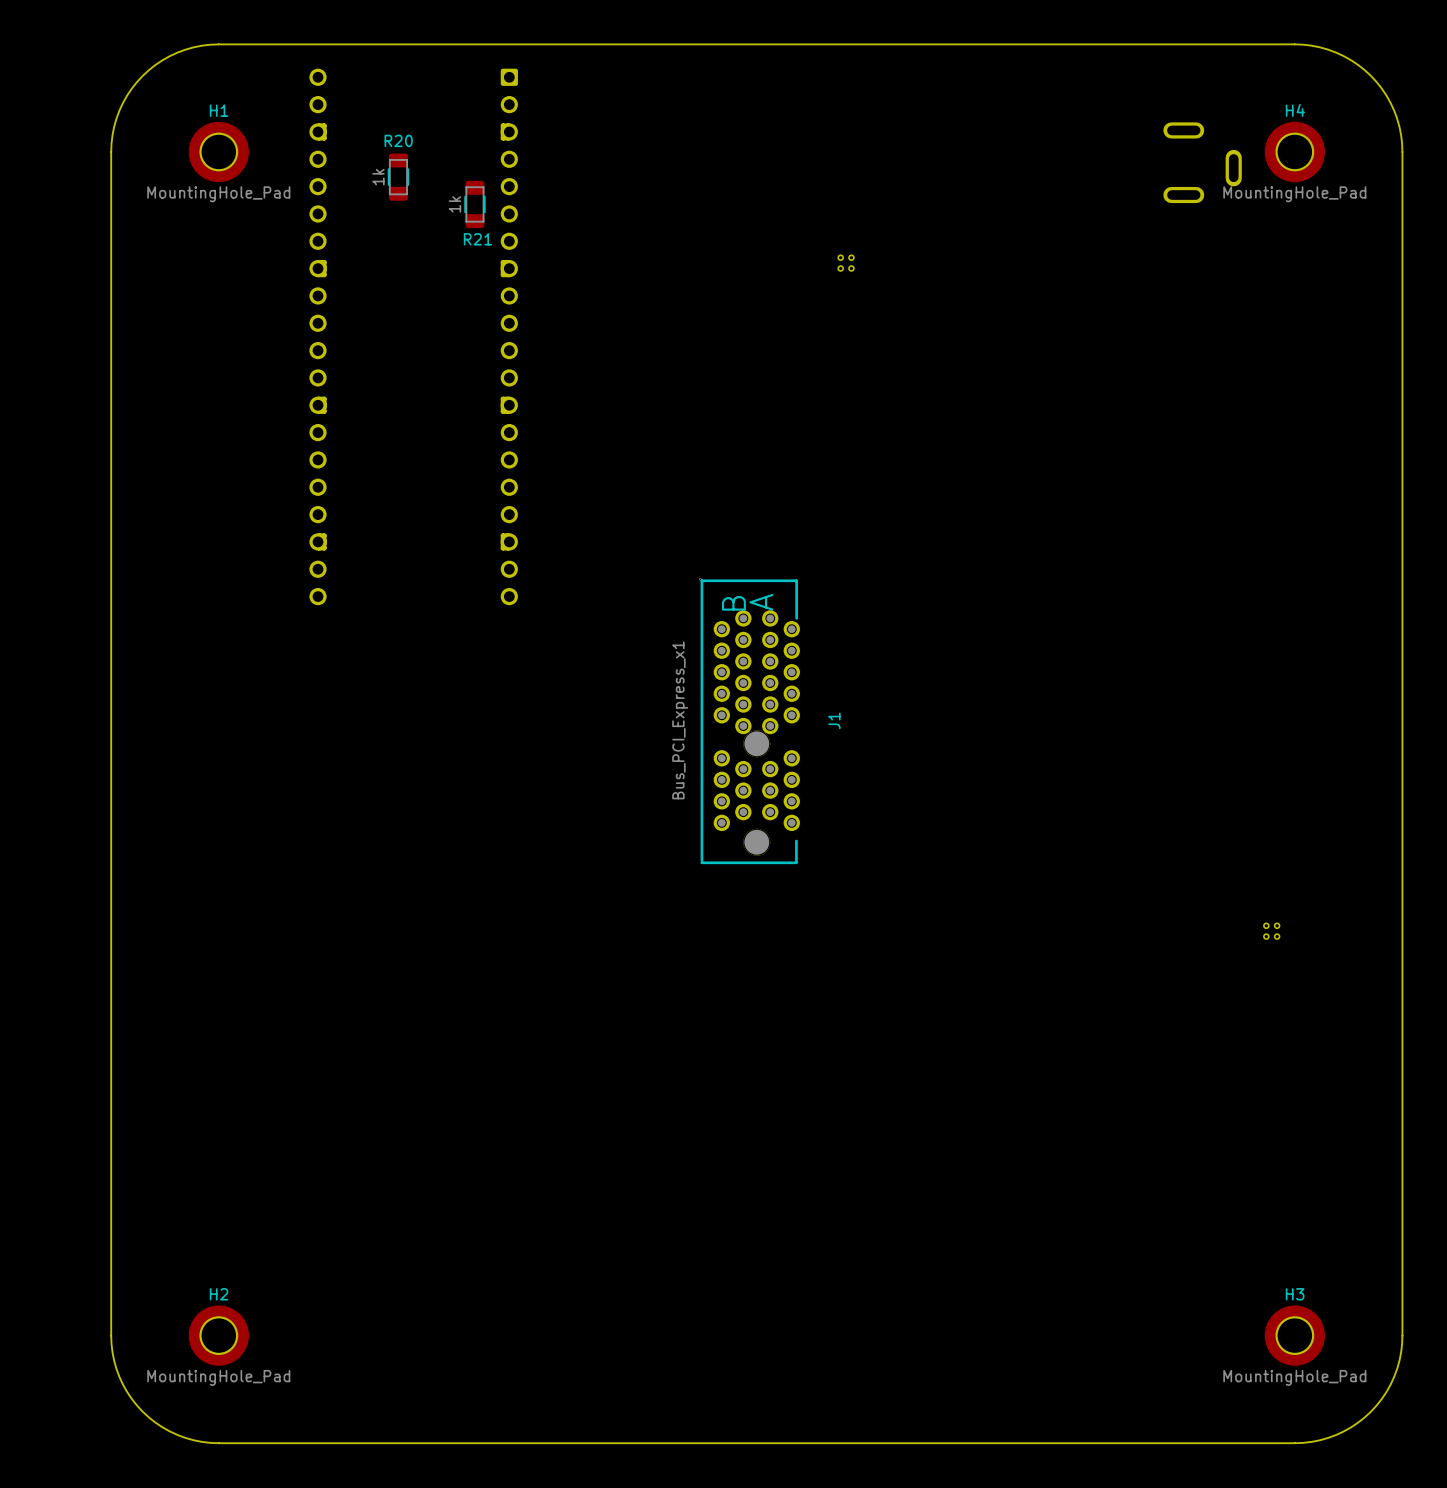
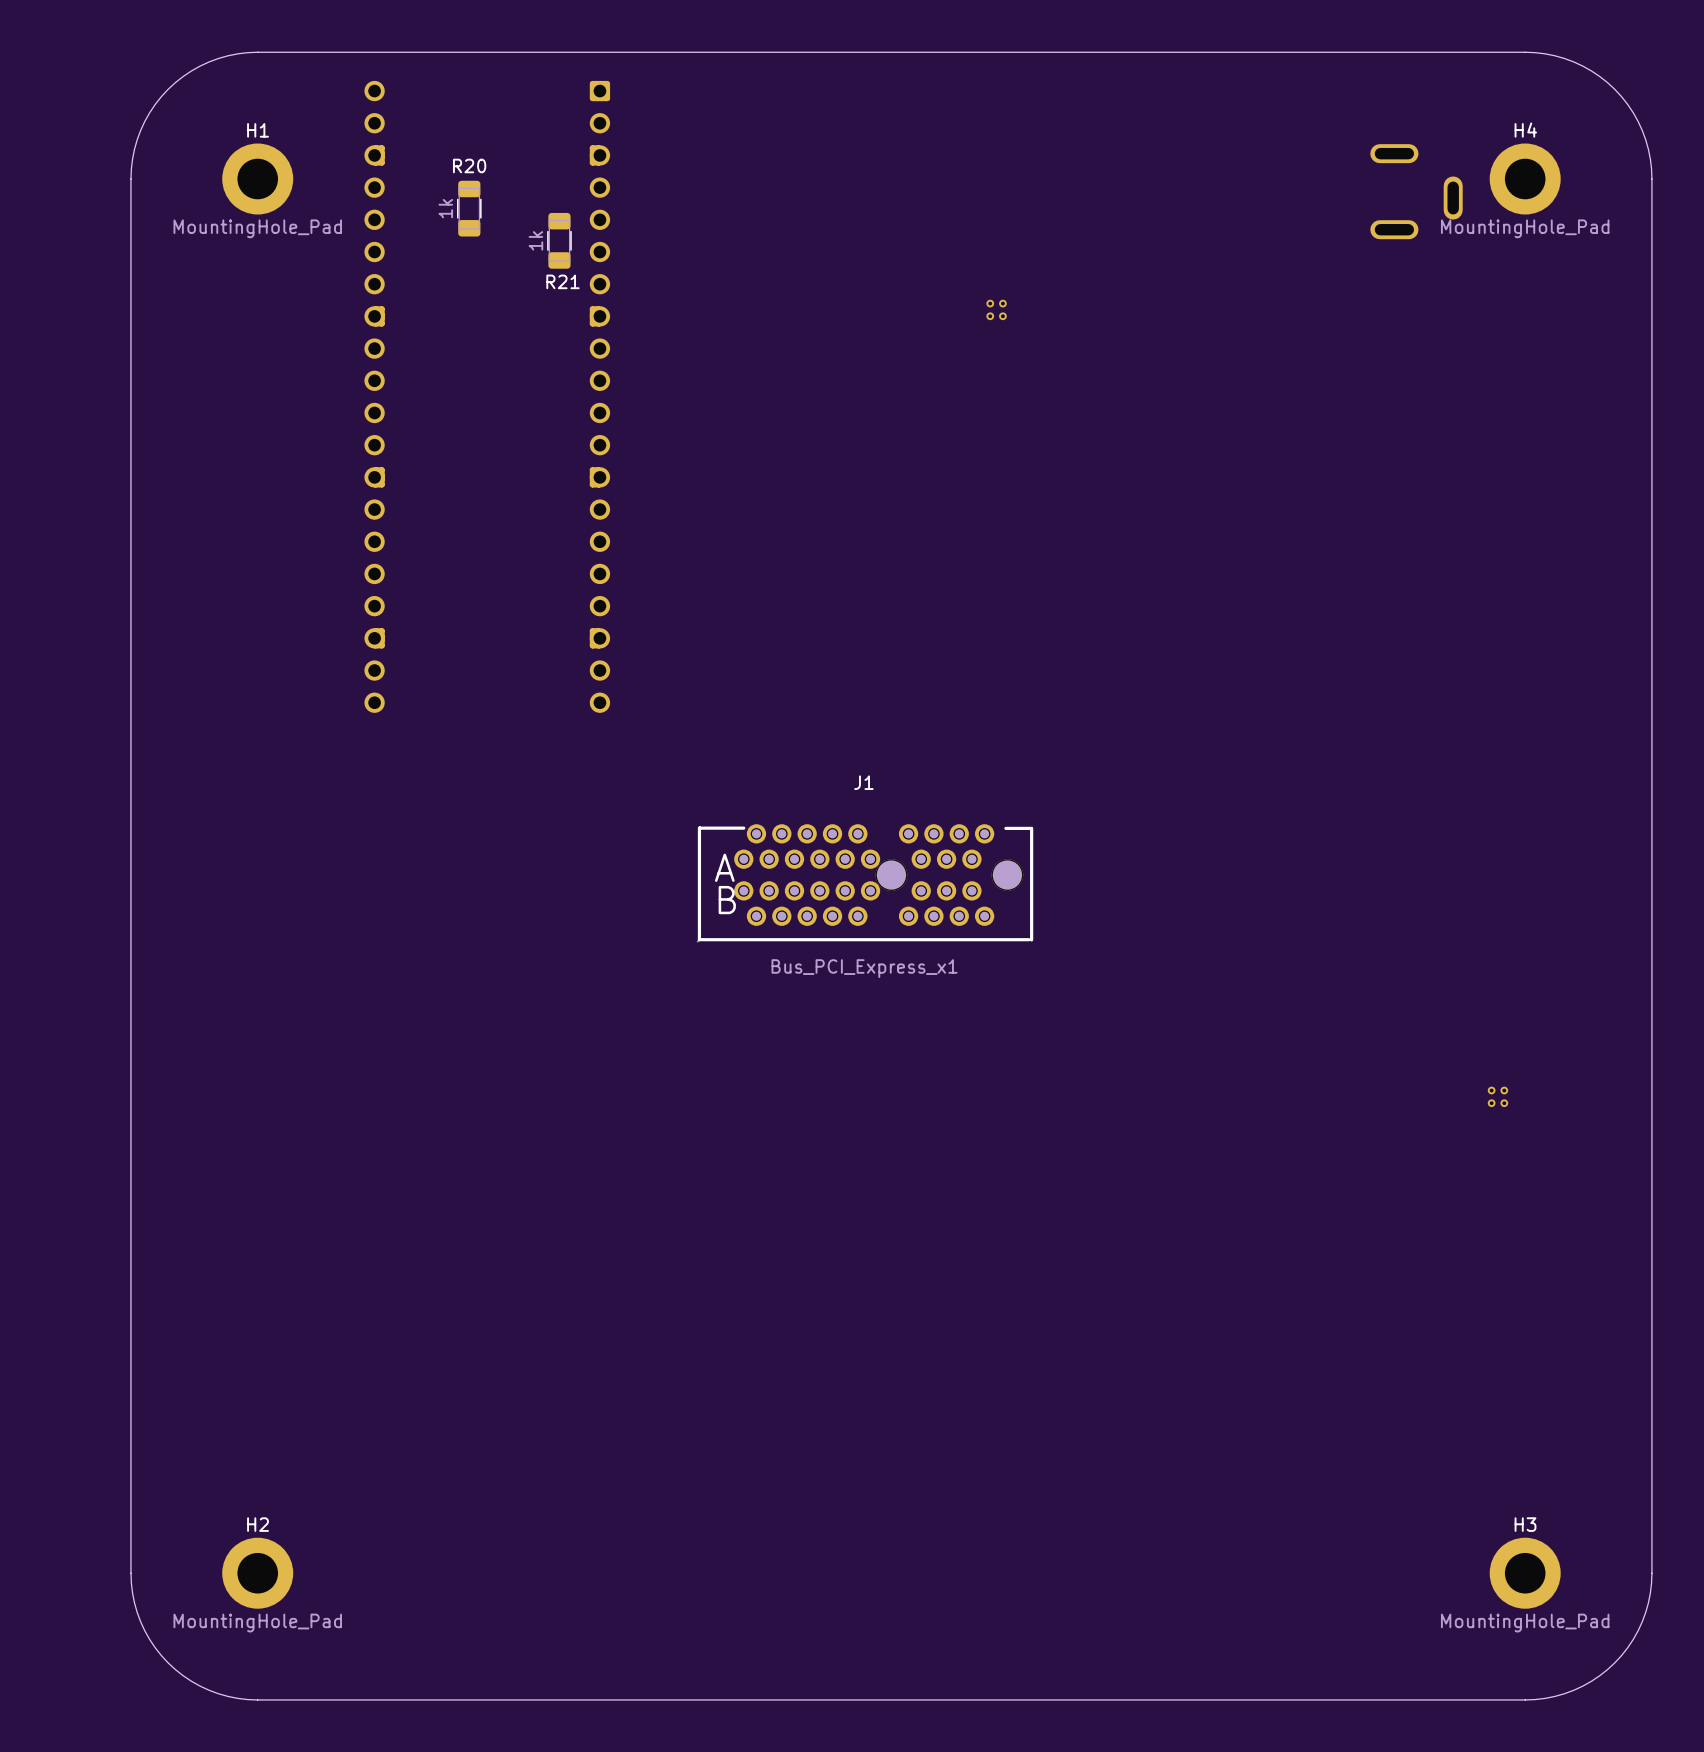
J1 rotation: 0° (749, 721) -> 90° counterclockwise (865, 883)

